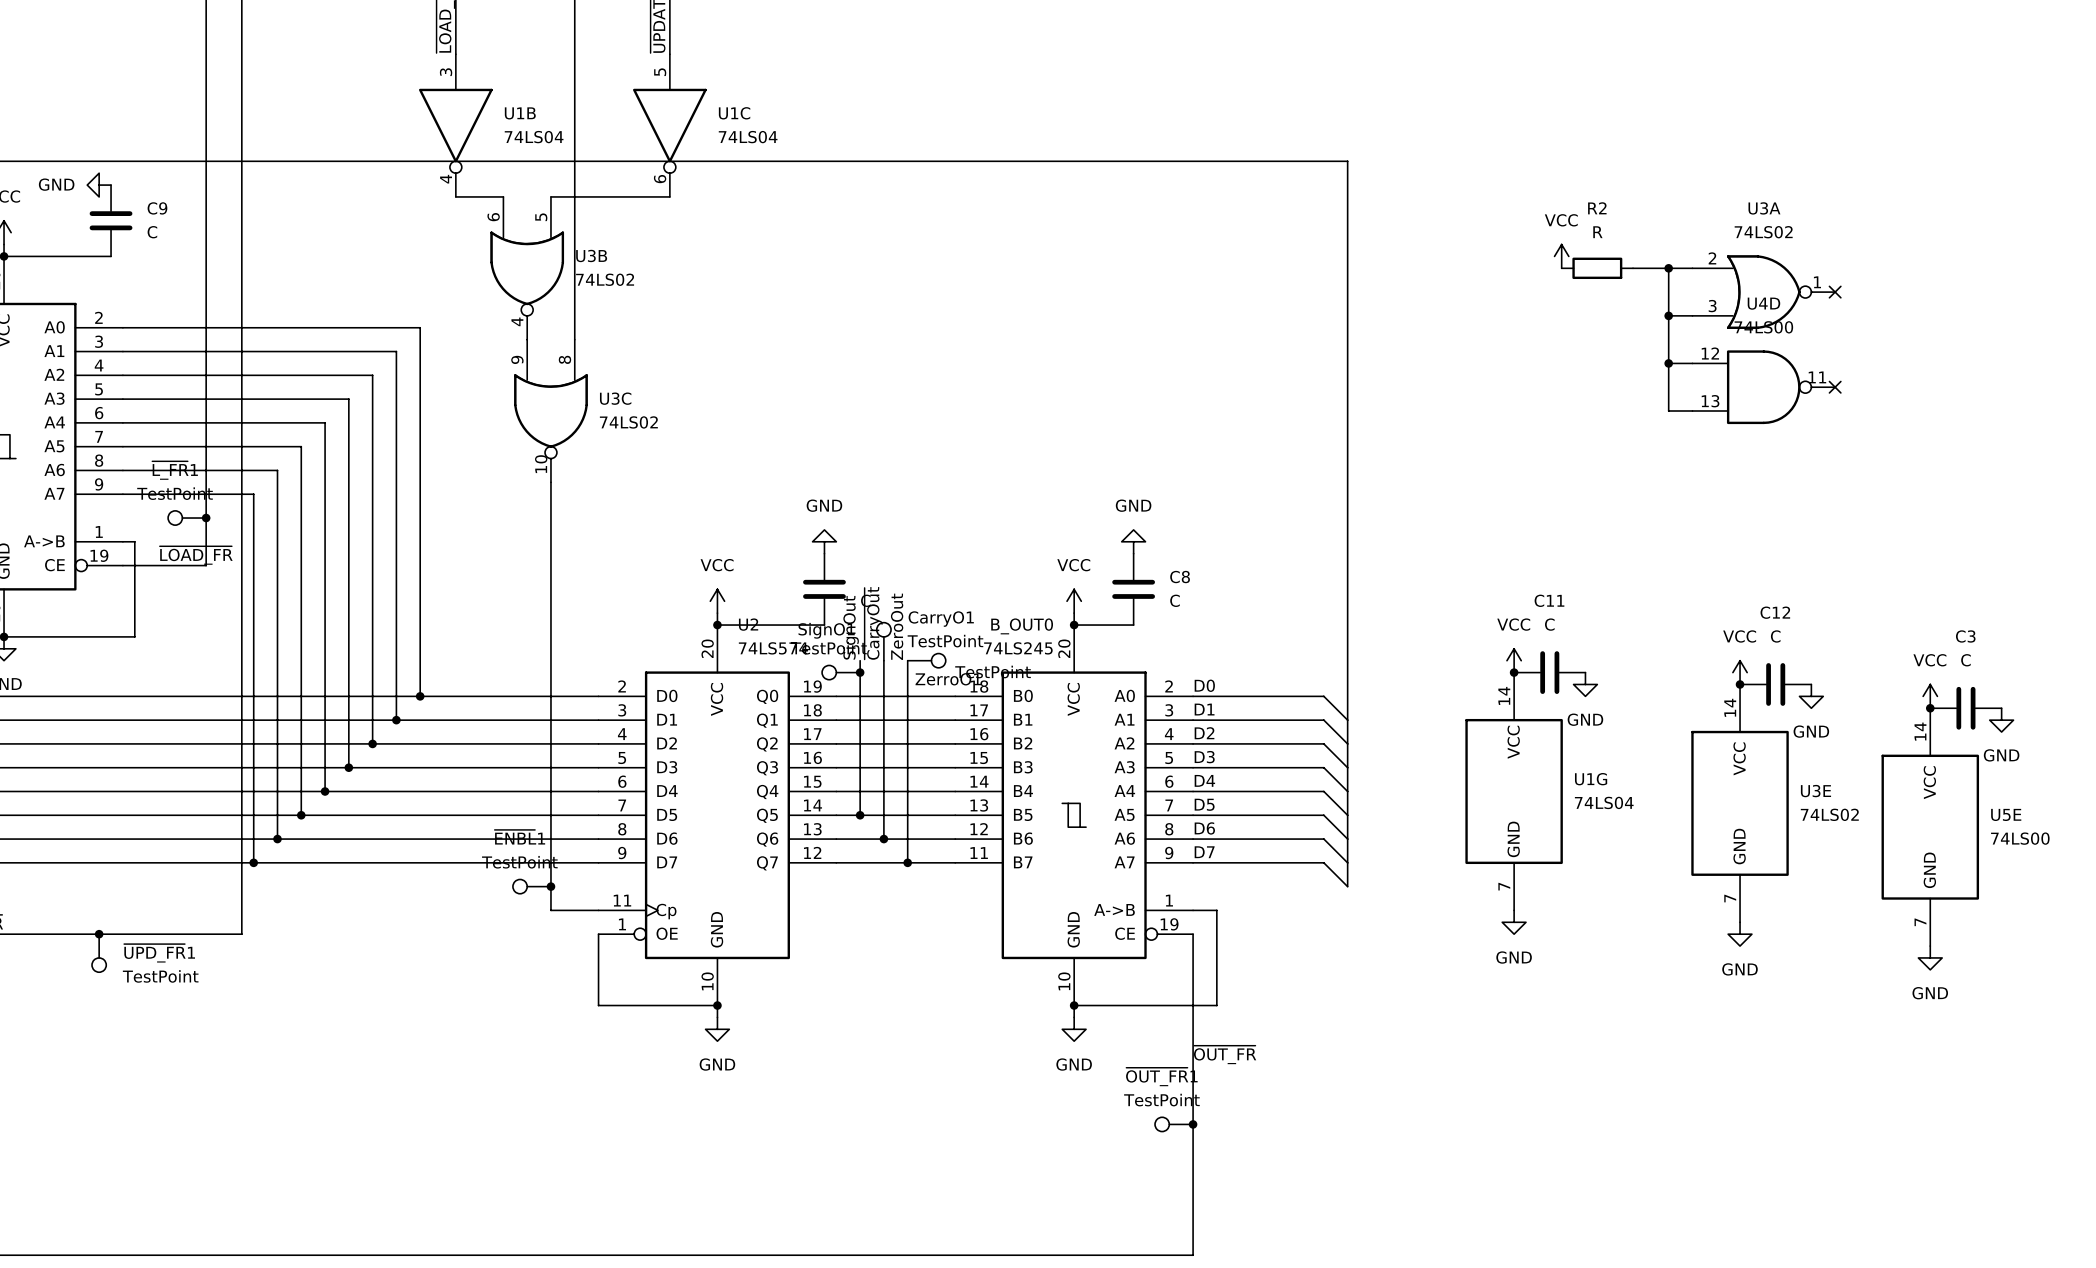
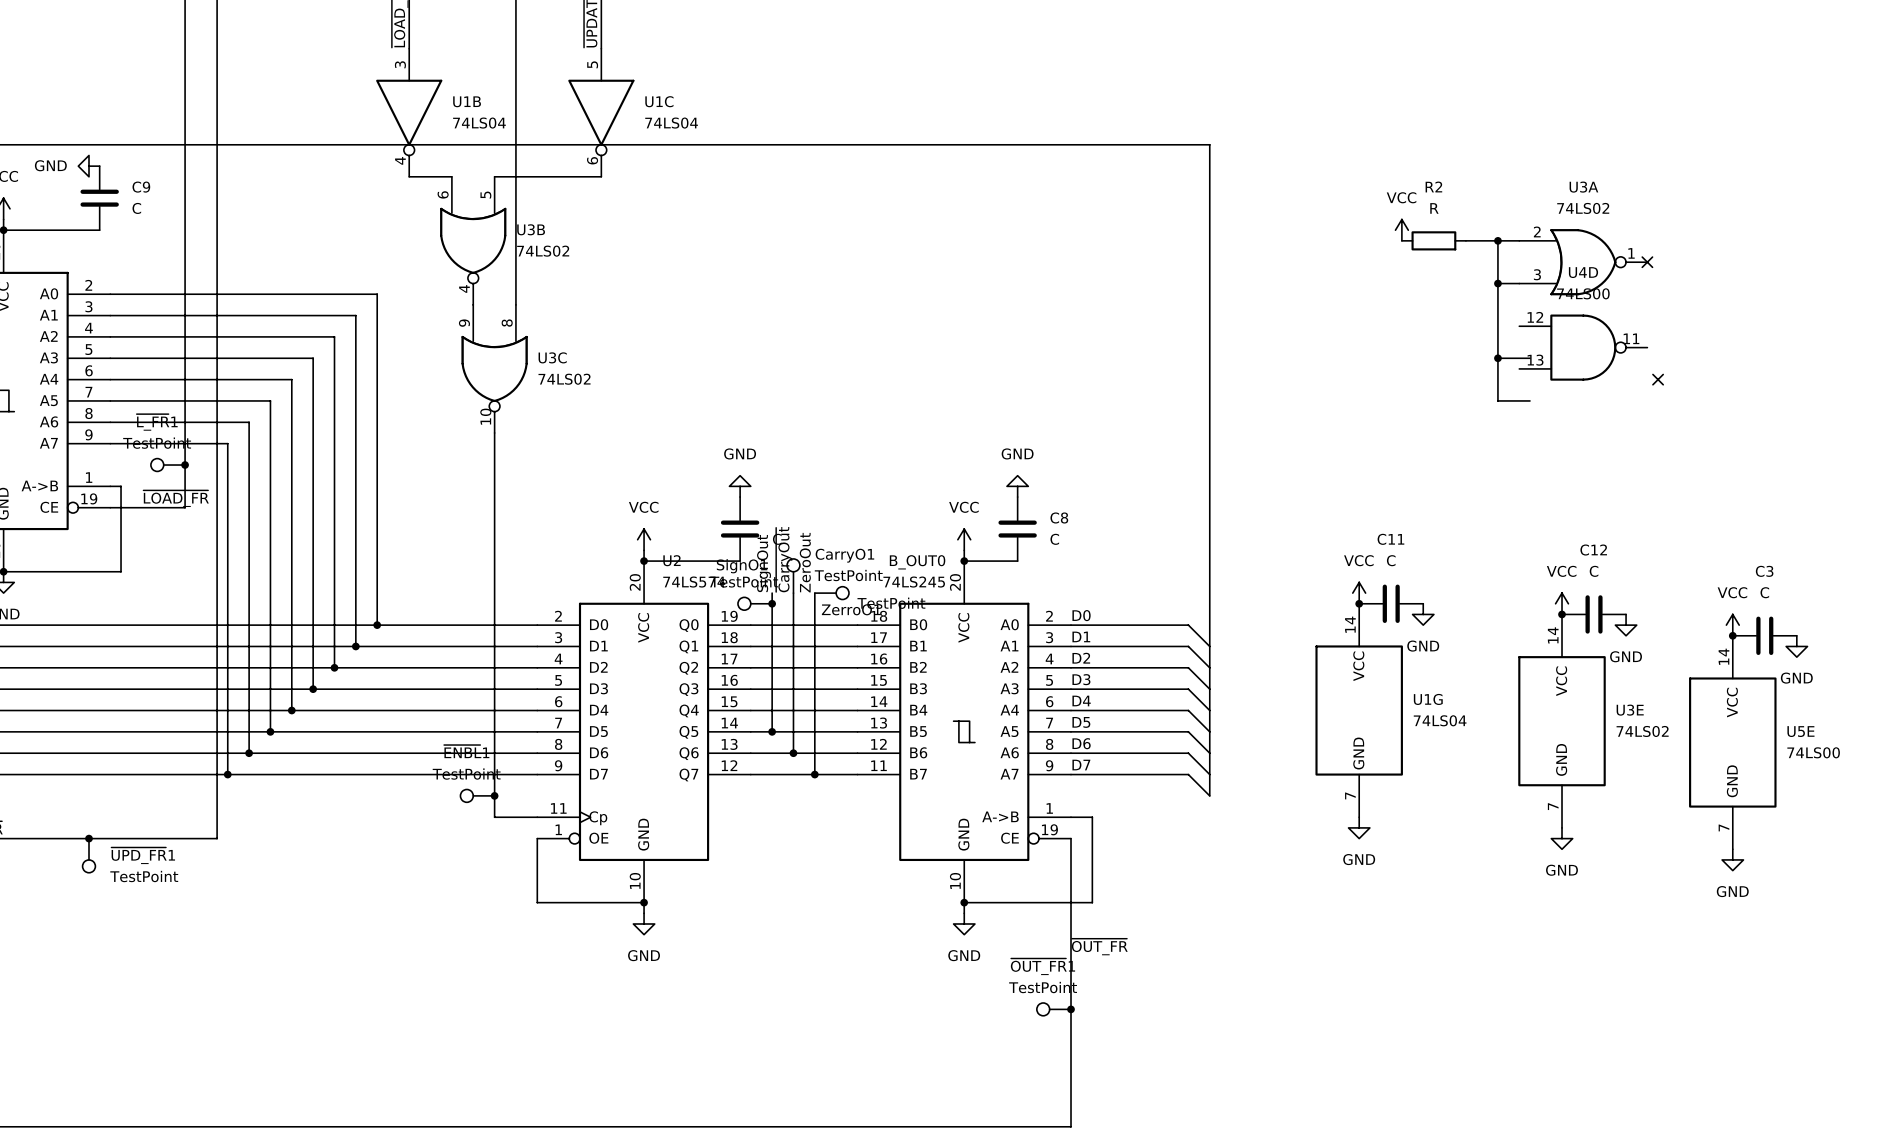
wire: (1668, 363) (1692, 363) -> none
junction position: (1668, 363) -> (1497, 358)
no-connect mark position: (1835, 387) -> (1658, 379)
wire: none -> (1497, 358) (1529, 358)
wire: (1668, 411) (1692, 411) -> (1497, 368) (1497, 400) (1529, 400)

